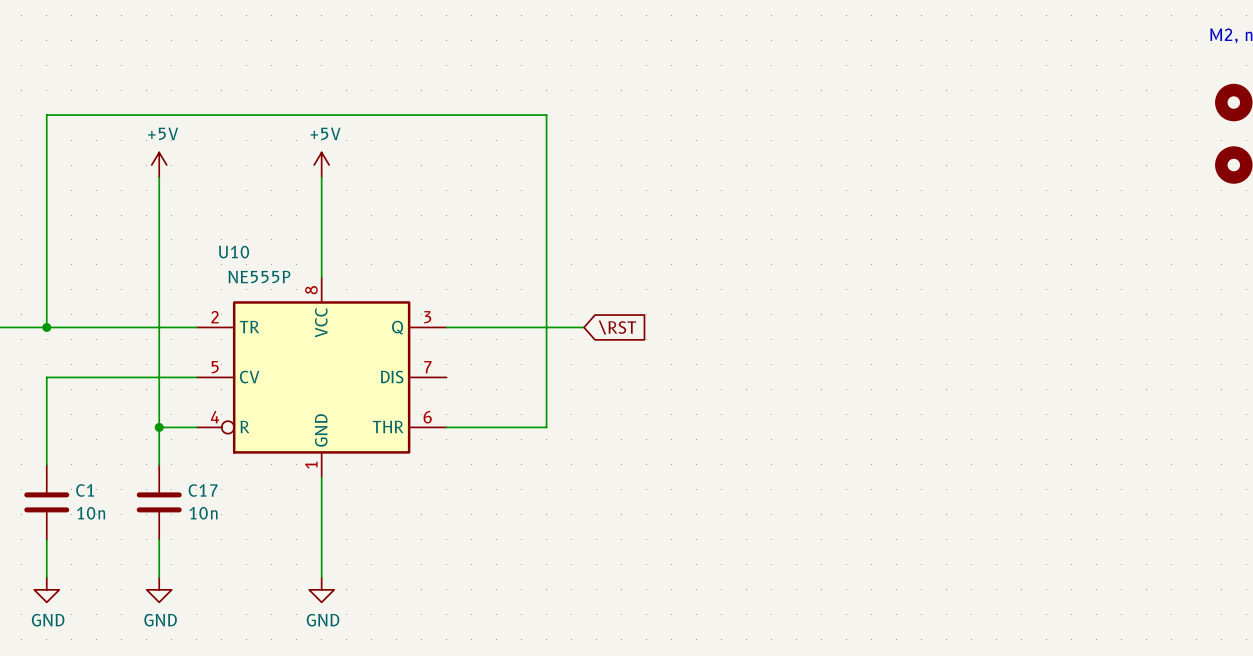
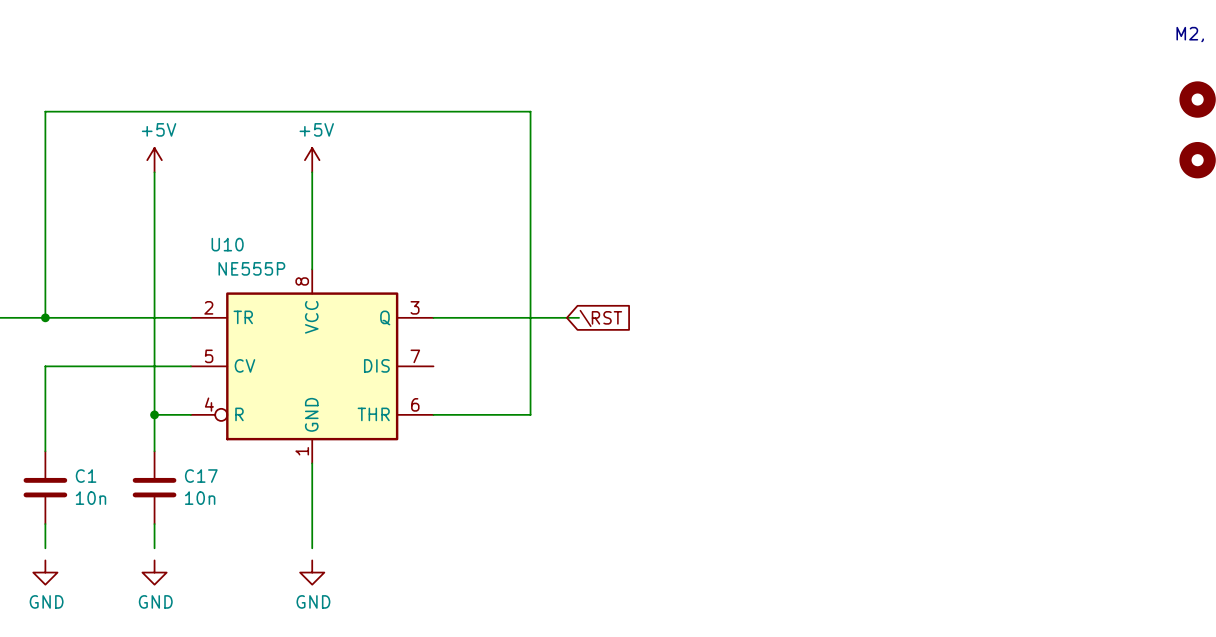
wire: none -> (566, 317) (579, 317)
wire: (46, 564) (46, 577) -> none
wire: (159, 564) (159, 577) -> none
wire: (321, 564) (321, 577) -> none

